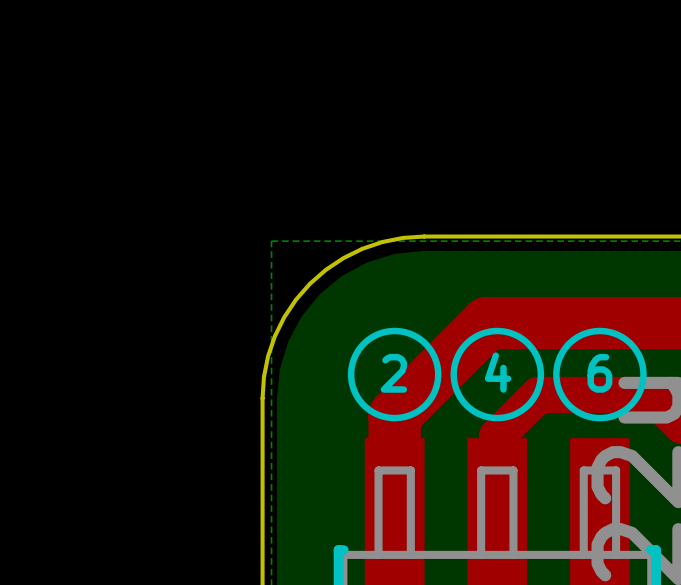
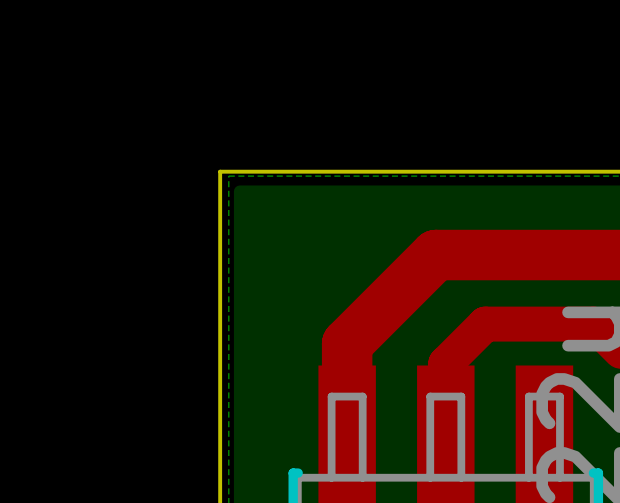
board edge: (424, 236) (382, 242) (362, 248) (343, 258) (309, 283) (284, 317) (274, 336) (268, 356) (262, 398) -> (375, 171) (220, 171) (220, 327)
drawing: [347, 327, 647, 422] -> none
text: 4 (498, 372) -> none
text: 2 (393, 373) -> none
text: 6 (599, 373) -> none

